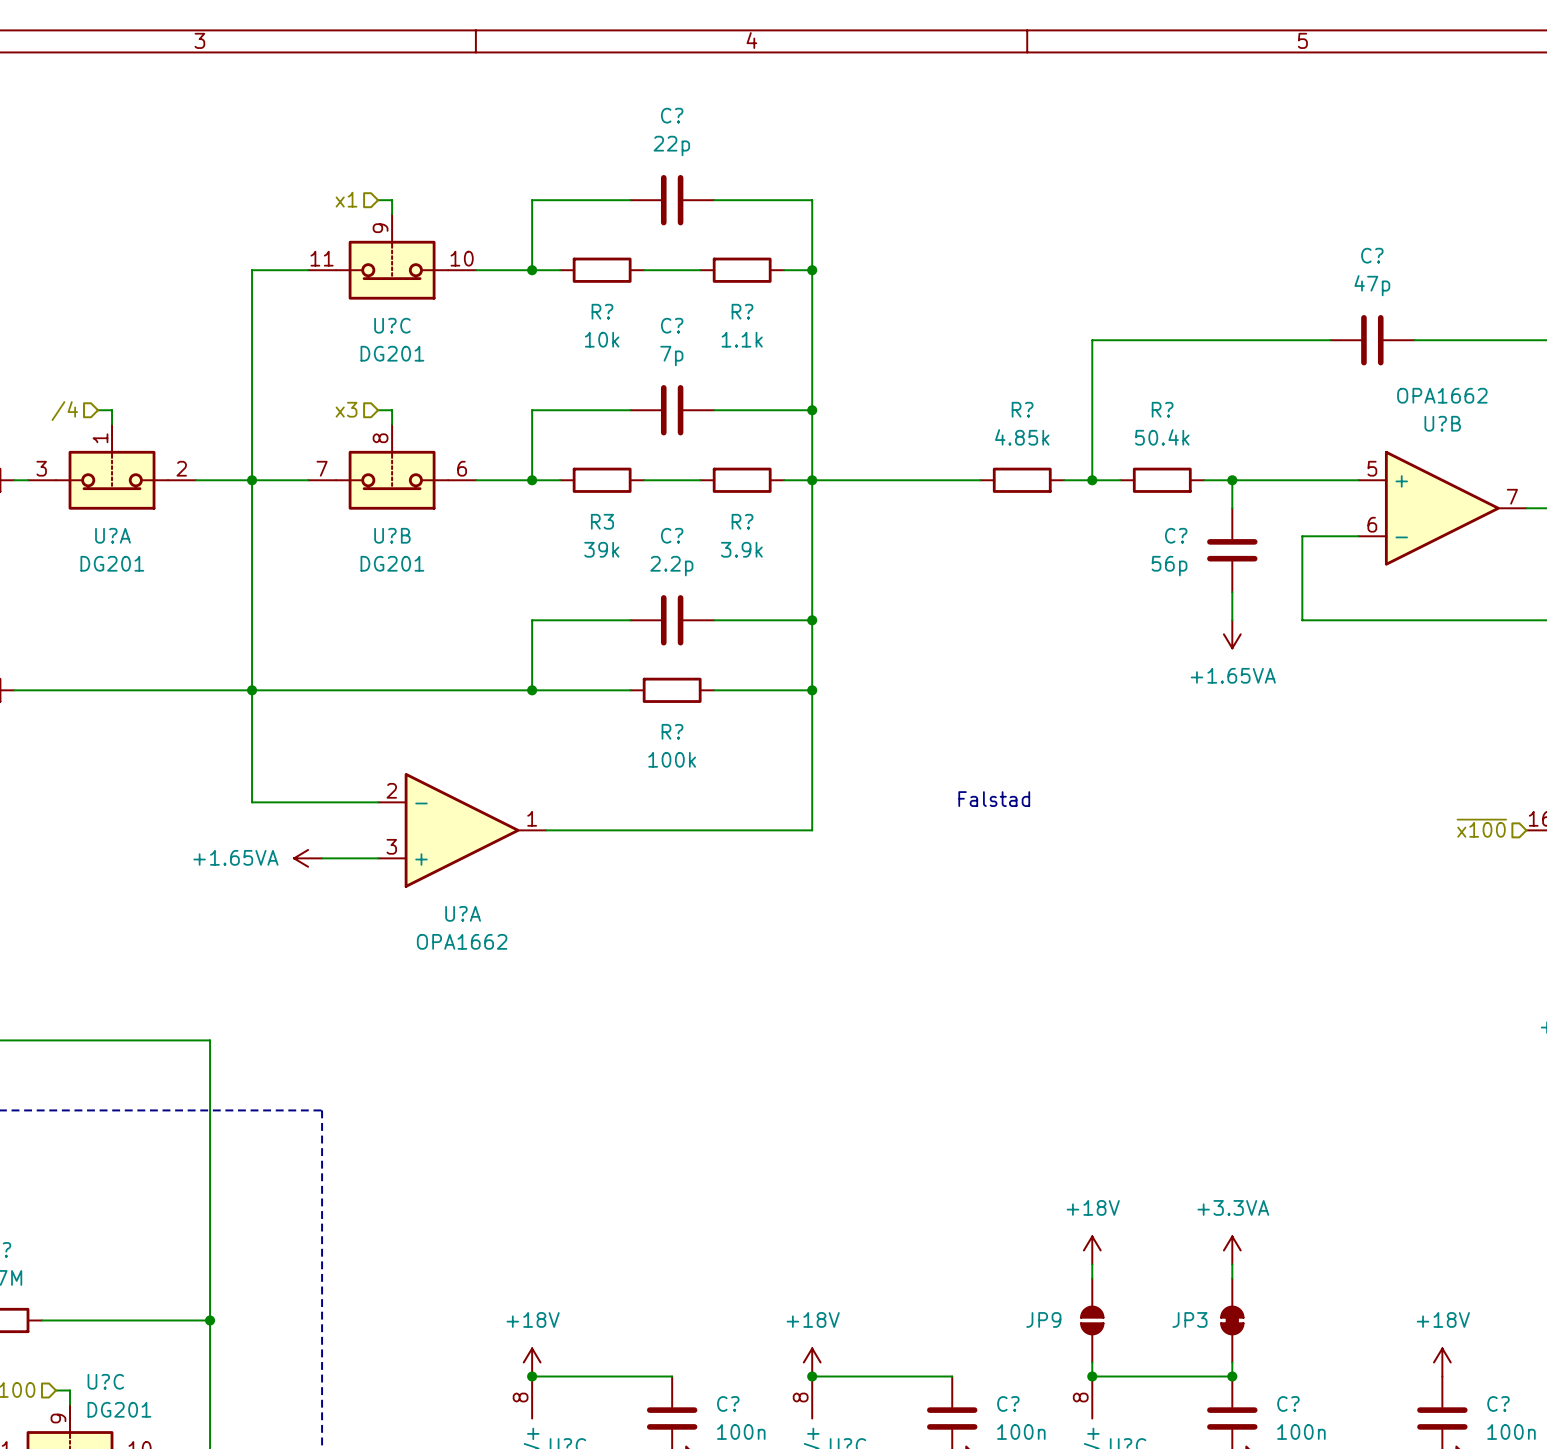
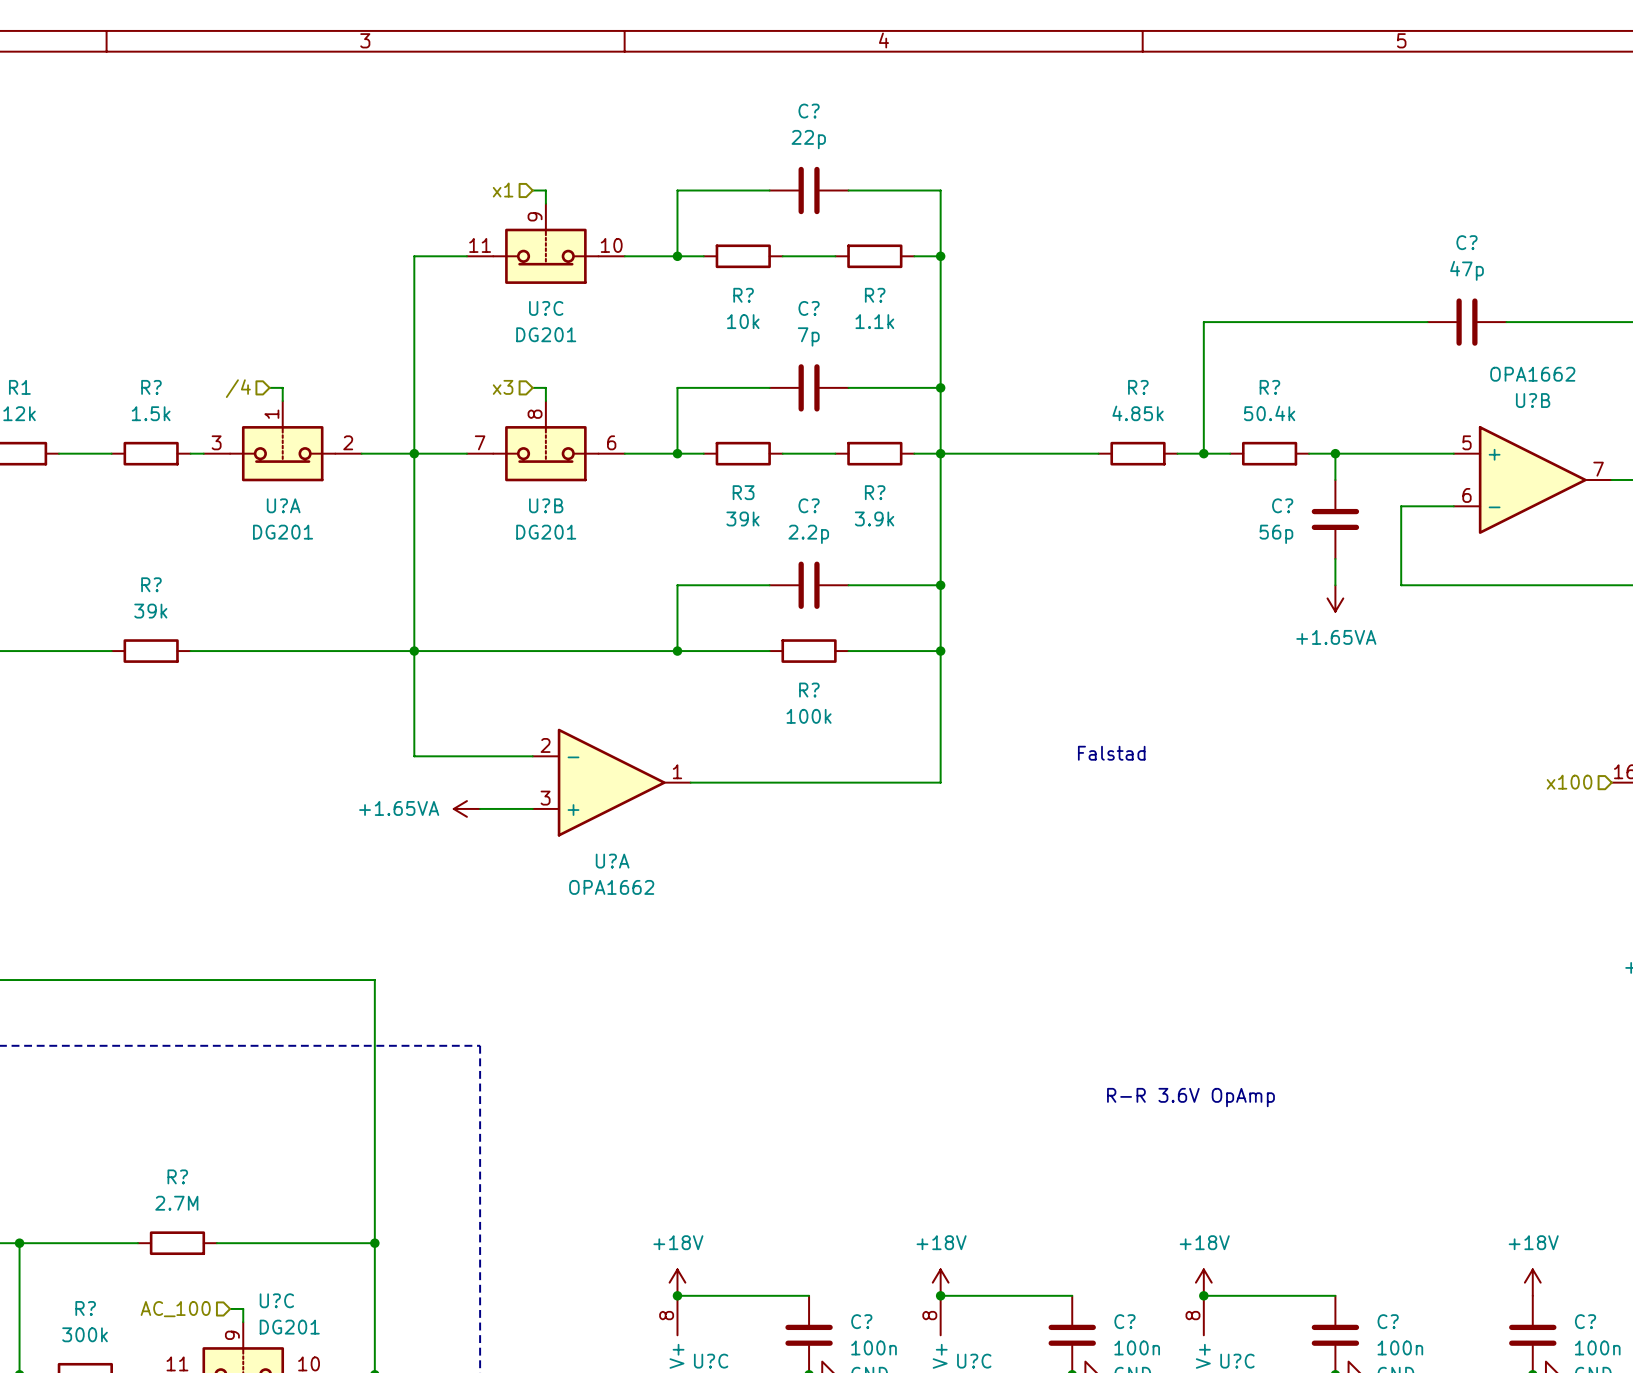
hierarchical label: ~{x100} (1481, 828) -> x100 (1569, 782)
text: none -> R-R 3.6V OpAmp (1190, 1097)
power symbol position: +18V (1092, 1250) -> +18V (1203, 1282)
power symbol: +3.3VA (1232, 1250) -> none
wire: (1092, 1264) (1092, 1278) -> none
wire: (1232, 1264) (1232, 1278) -> none
JP9: (1092, 1320) -> none
JP3: (1232, 1320) -> none
wire: (1232, 1362) (1232, 1376) -> none
junction: (1232, 1376) -> none

